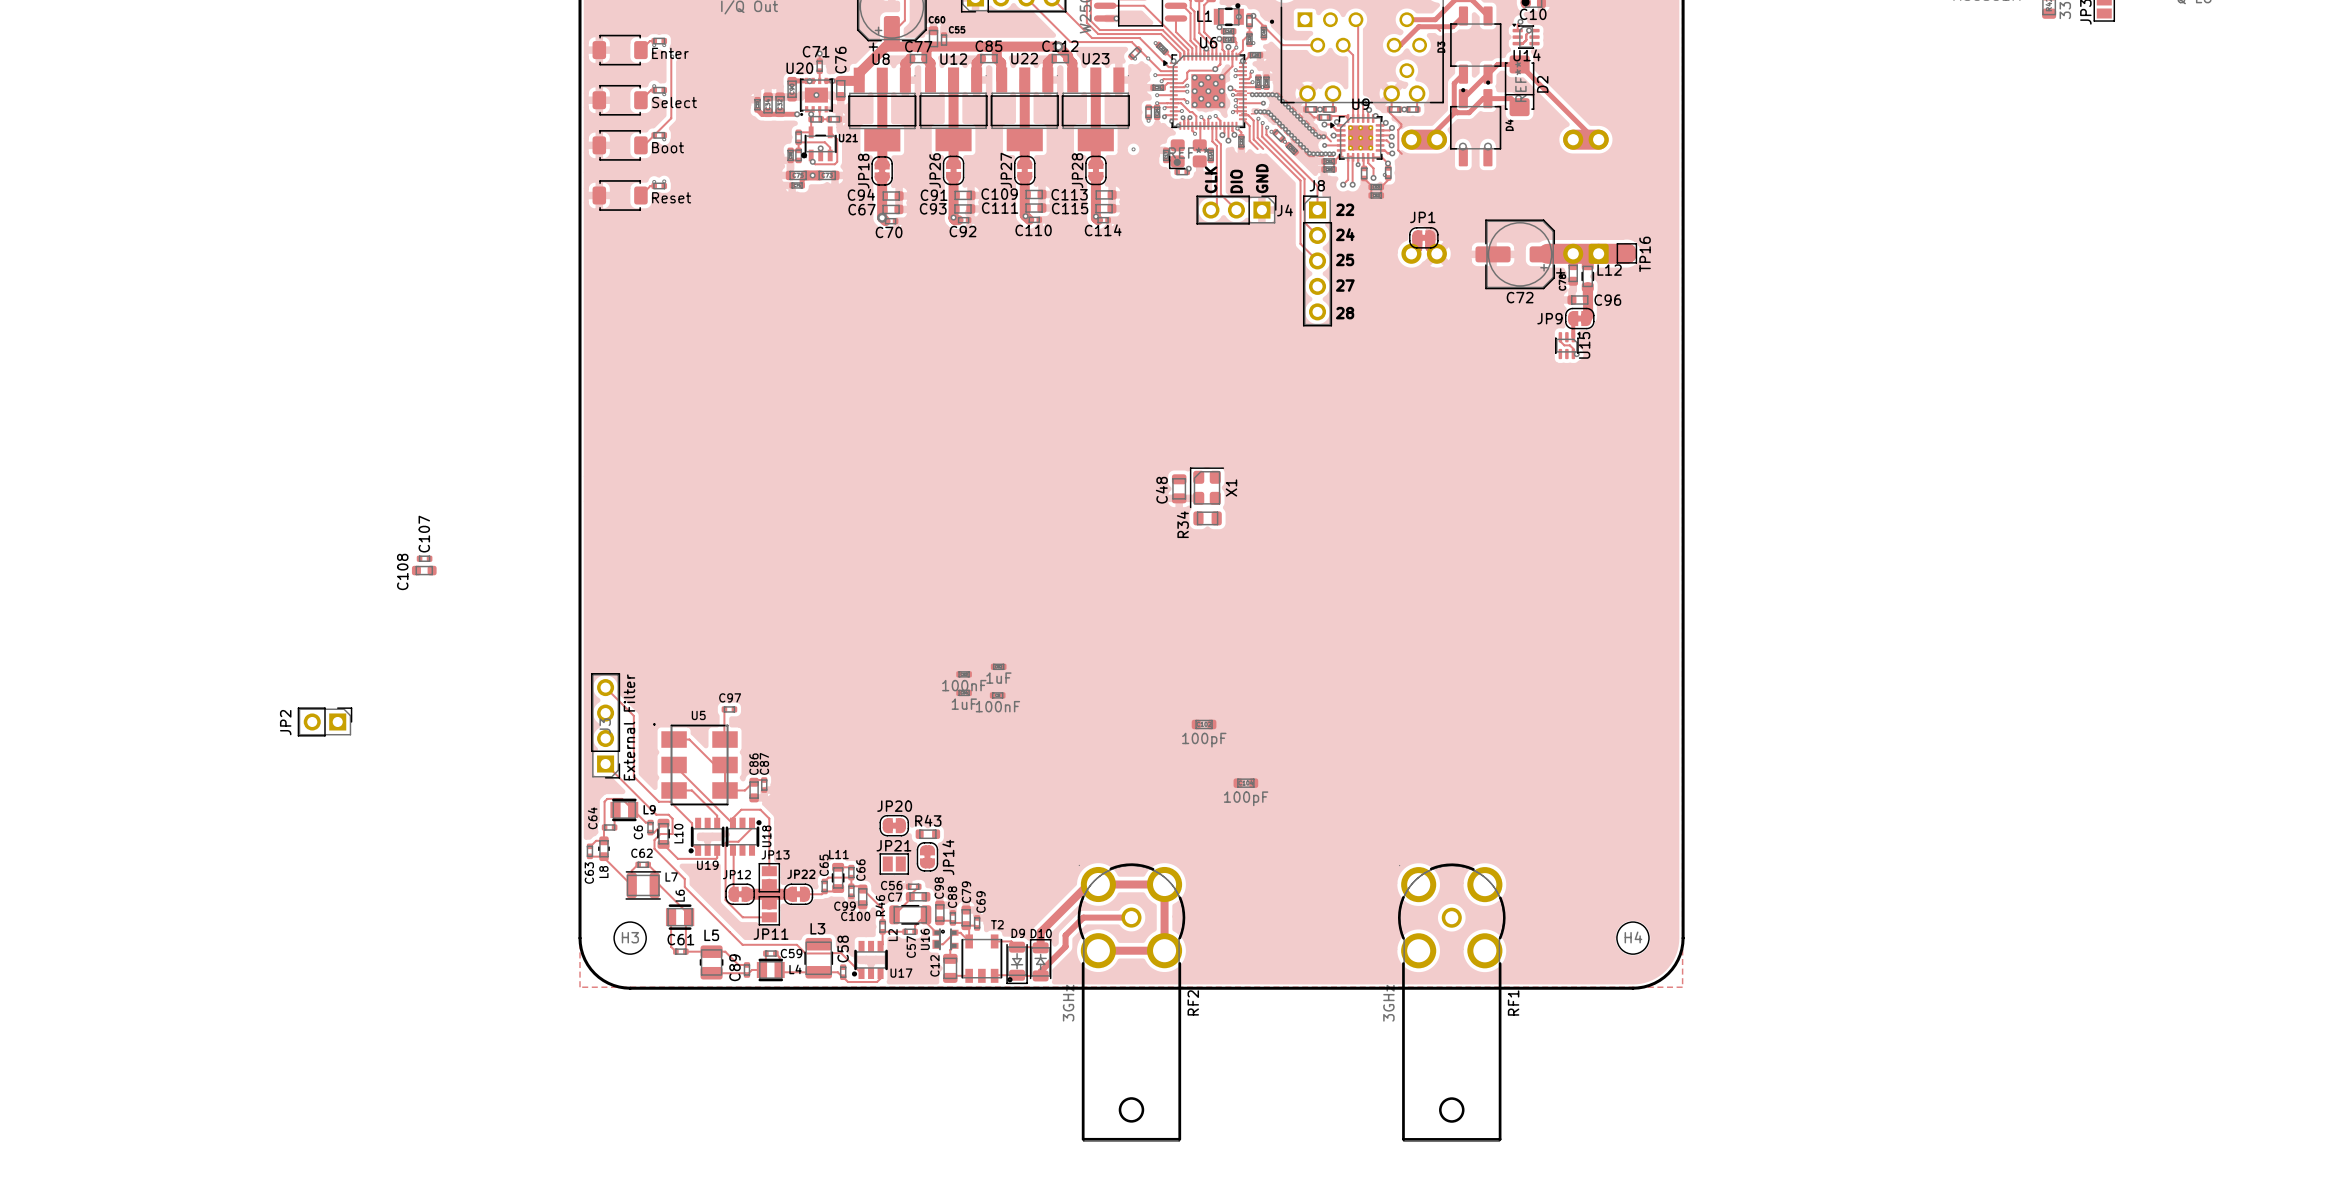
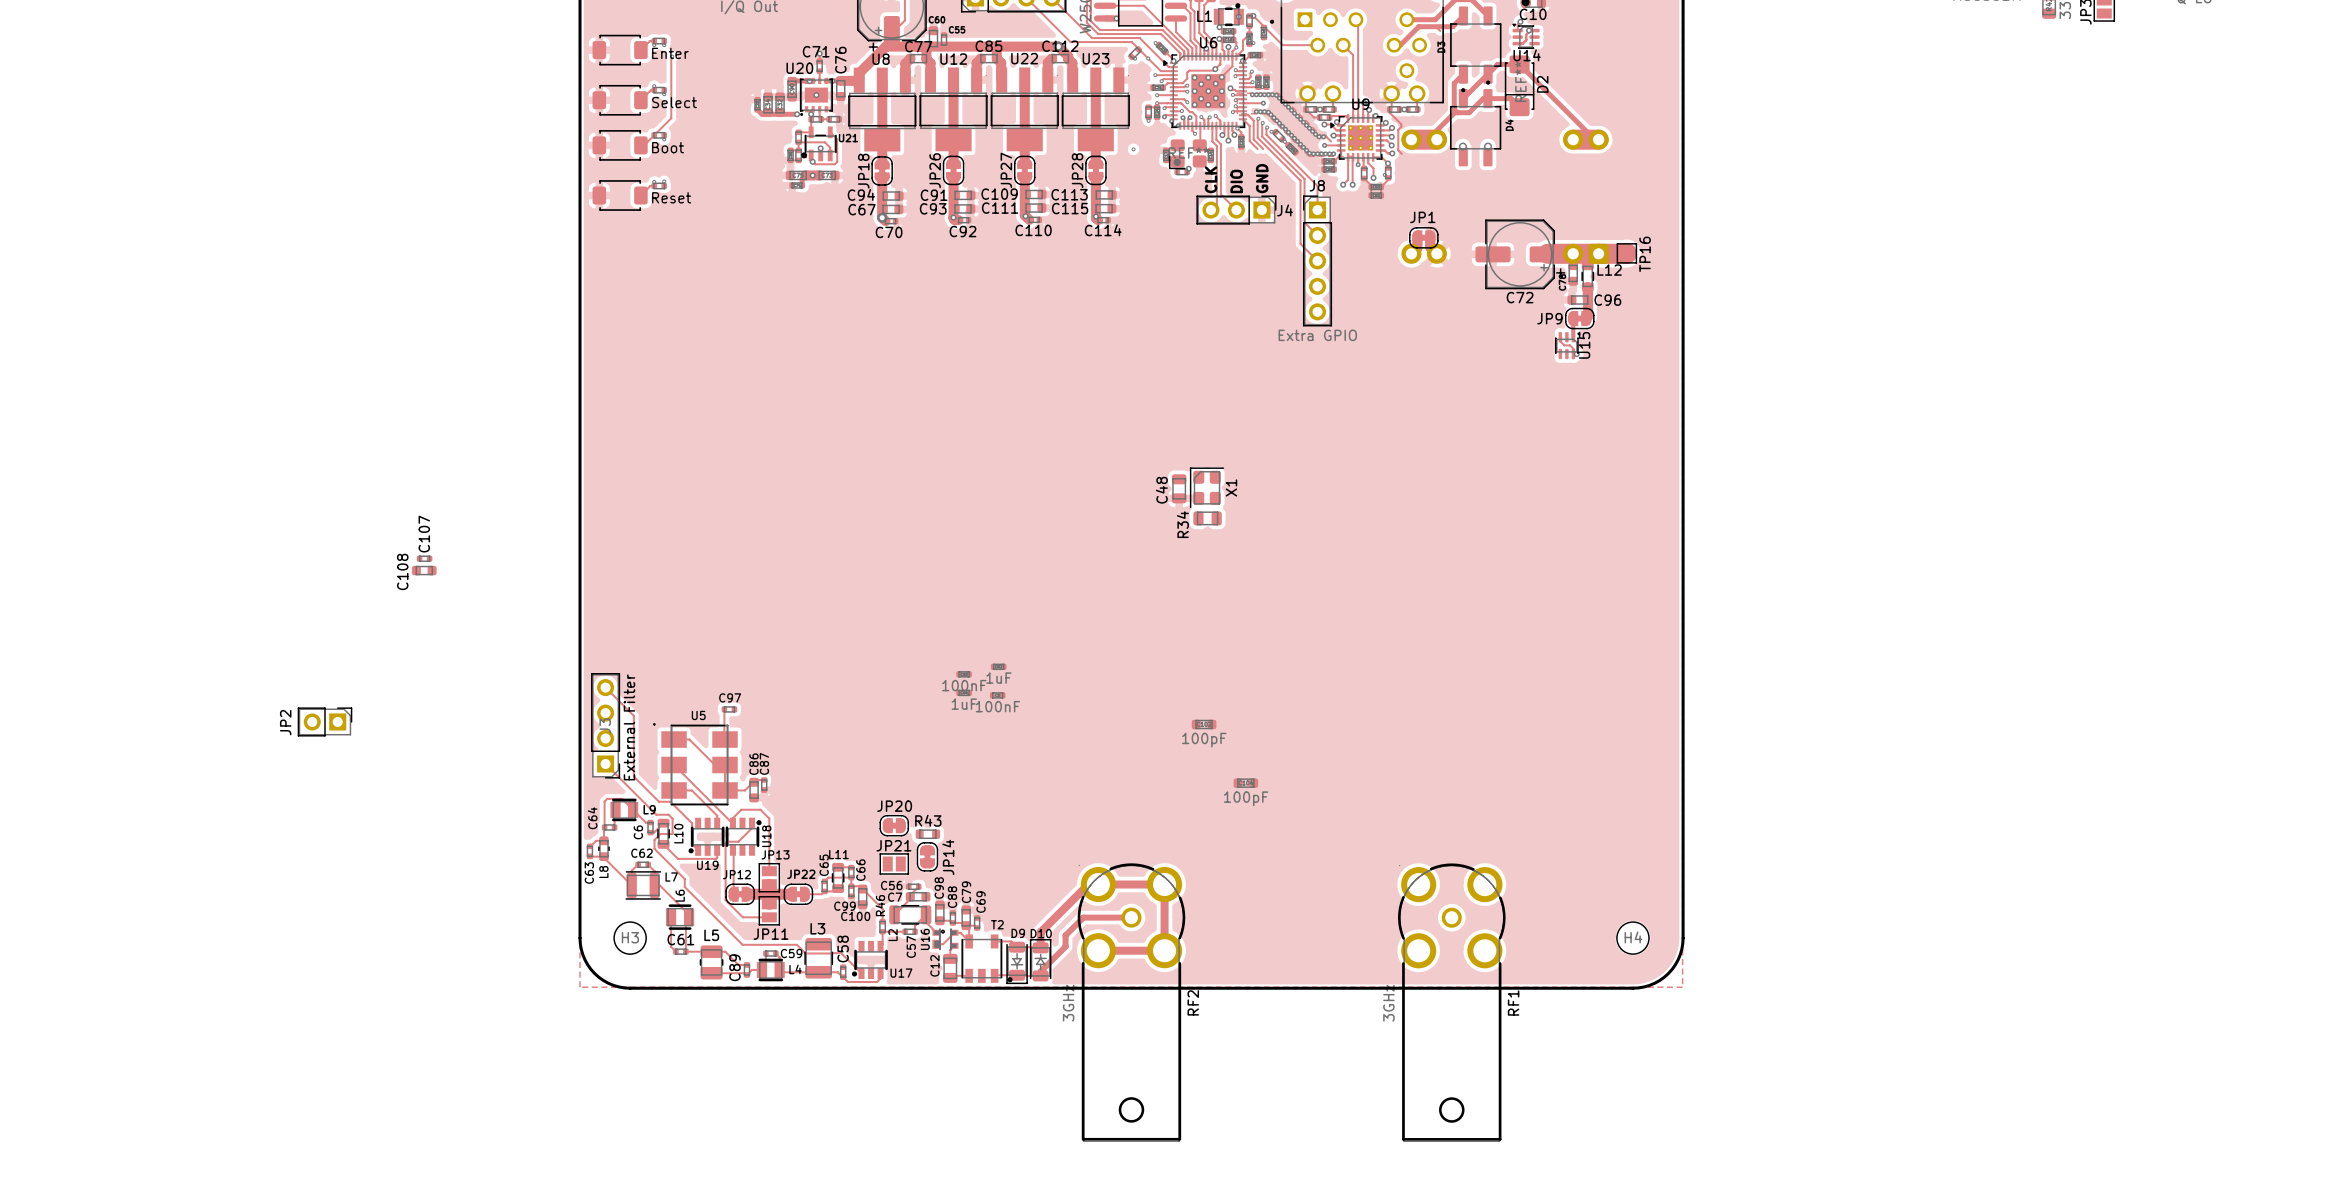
text: 22 (1345, 209) -> none
text: 24 (1345, 234) -> none
text: 25 (1345, 259) -> none
text: 27 (1345, 285) -> none
text: 28 (1345, 313) -> none
J8 value: none -> Extra GPIO (1317, 335)

